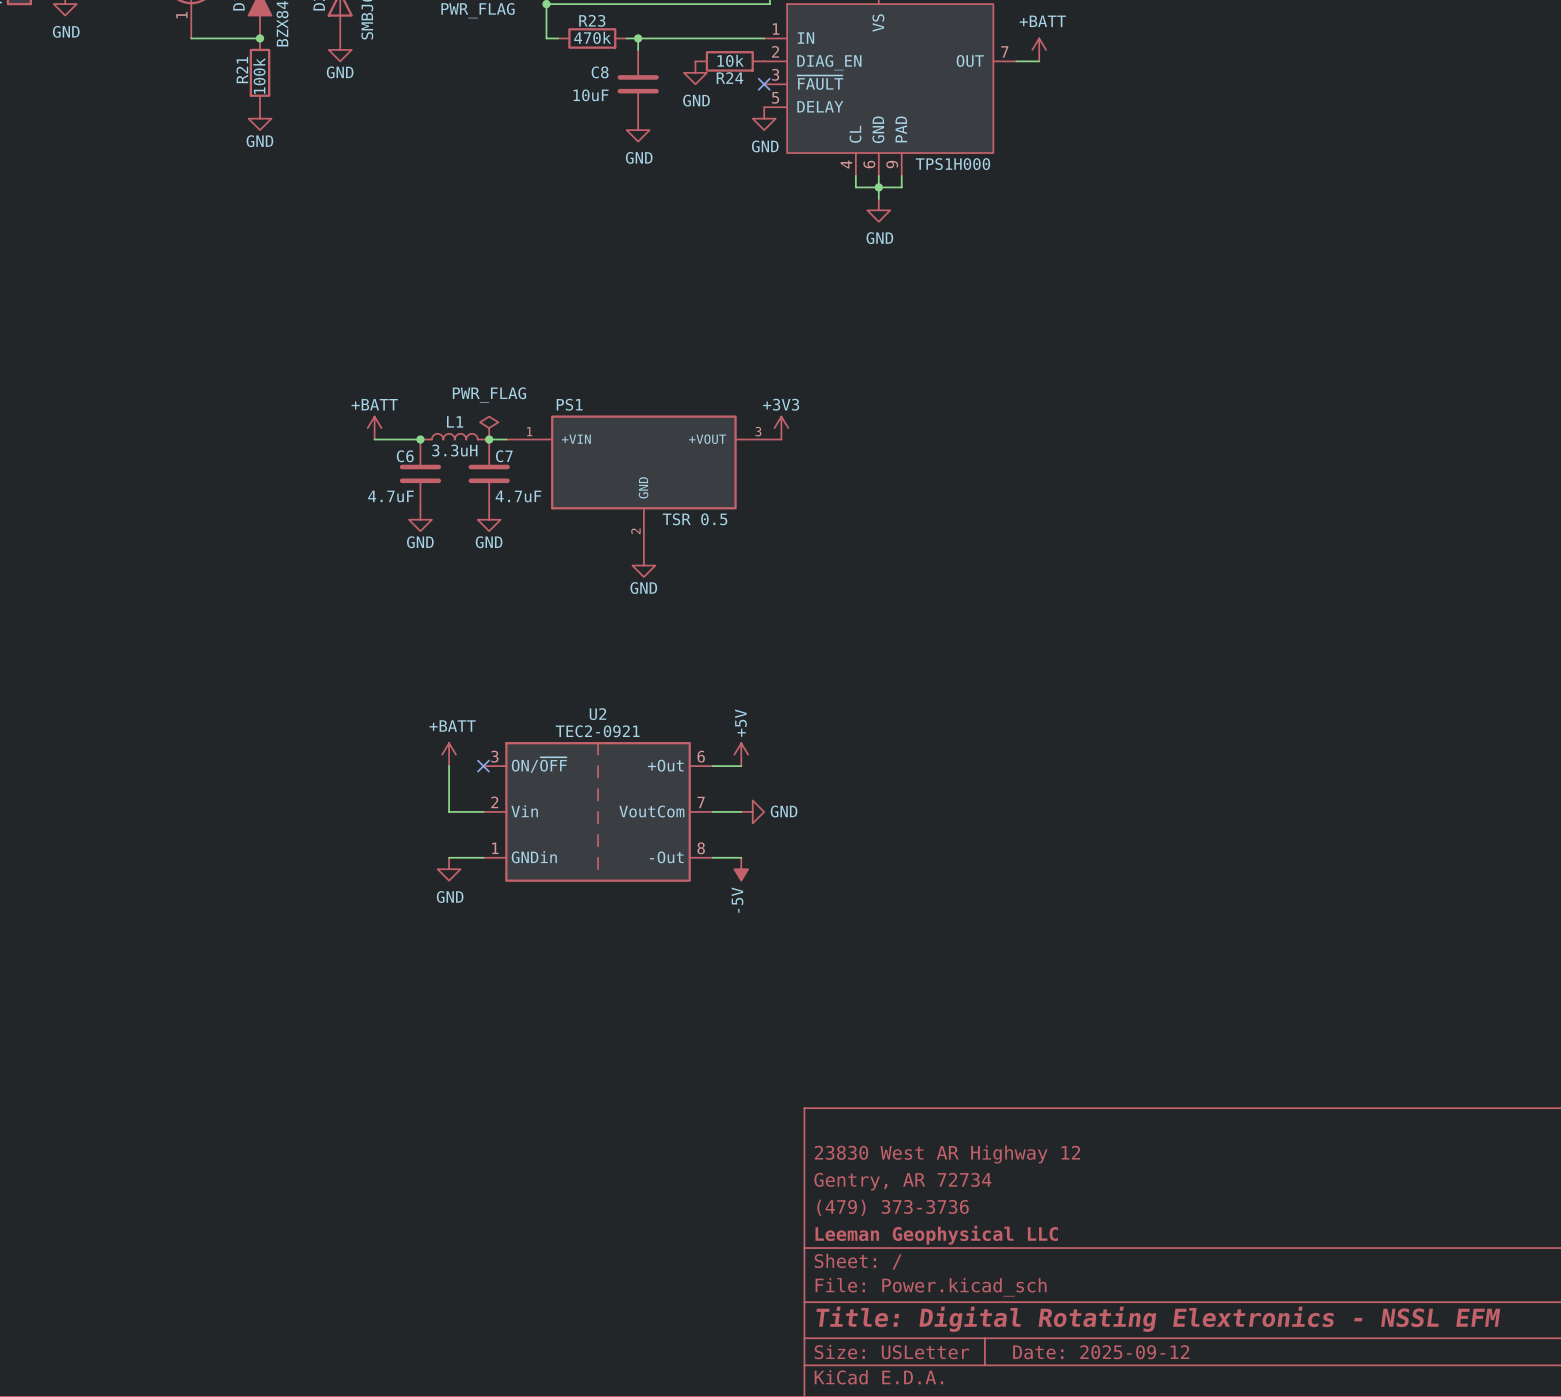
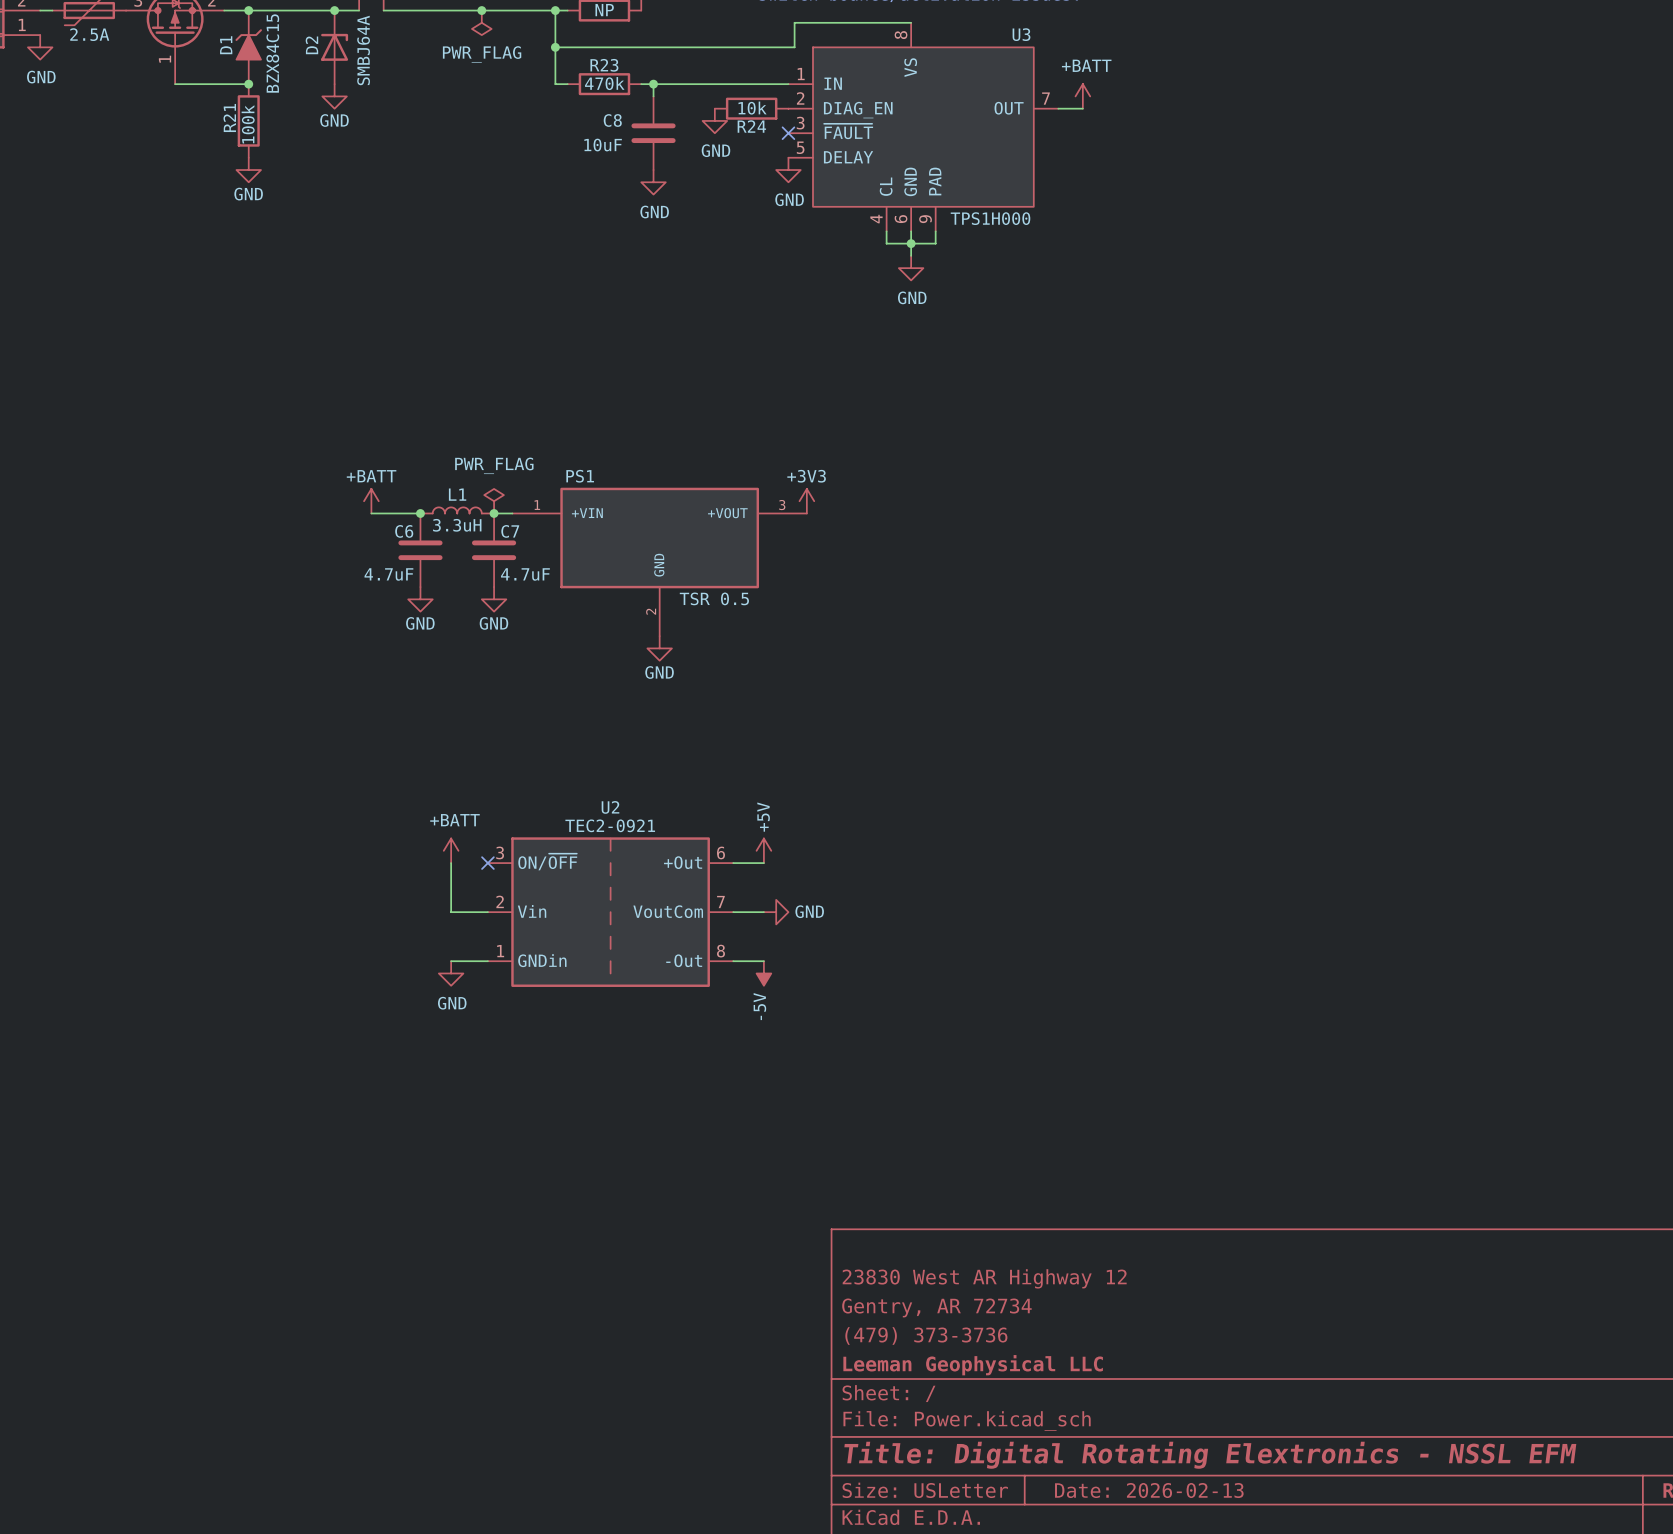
title block: Date: 2025-09-12 (1101, 1352) -> Date: 2026-02-13 (1149, 1490)

